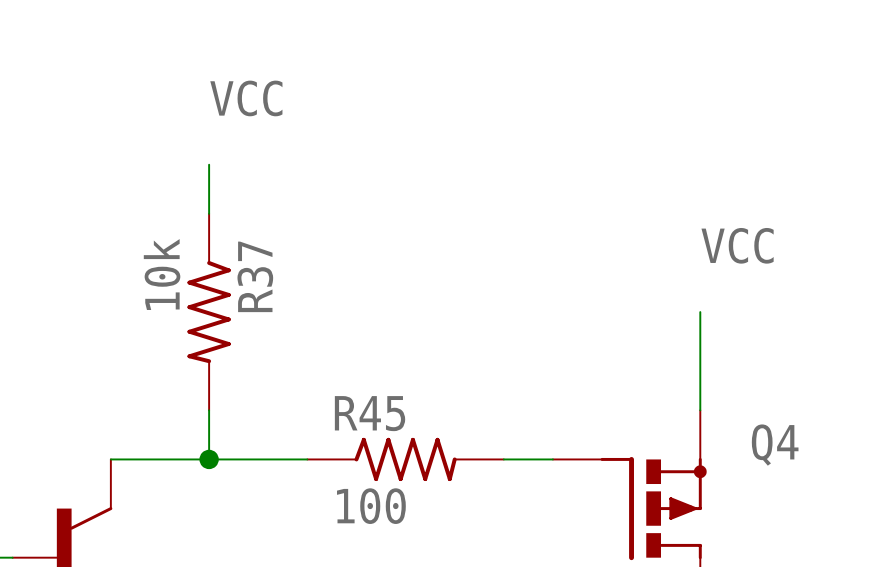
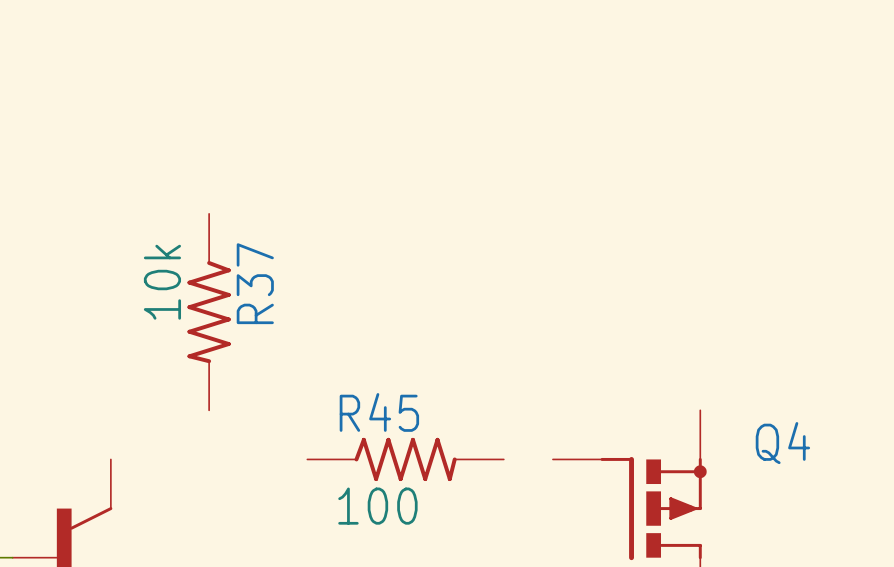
label: VCC (246, 98) -> none
wire: (209, 164) (209, 213) -> none
label: VCC (737, 245) -> none
wire: (700, 312) (700, 410) -> none
wire: (209, 410) (209, 459) -> none
wire: (110, 459) (307, 459) -> none
junction: (209, 459) -> none
wire: (503, 459) (552, 459) -> none

